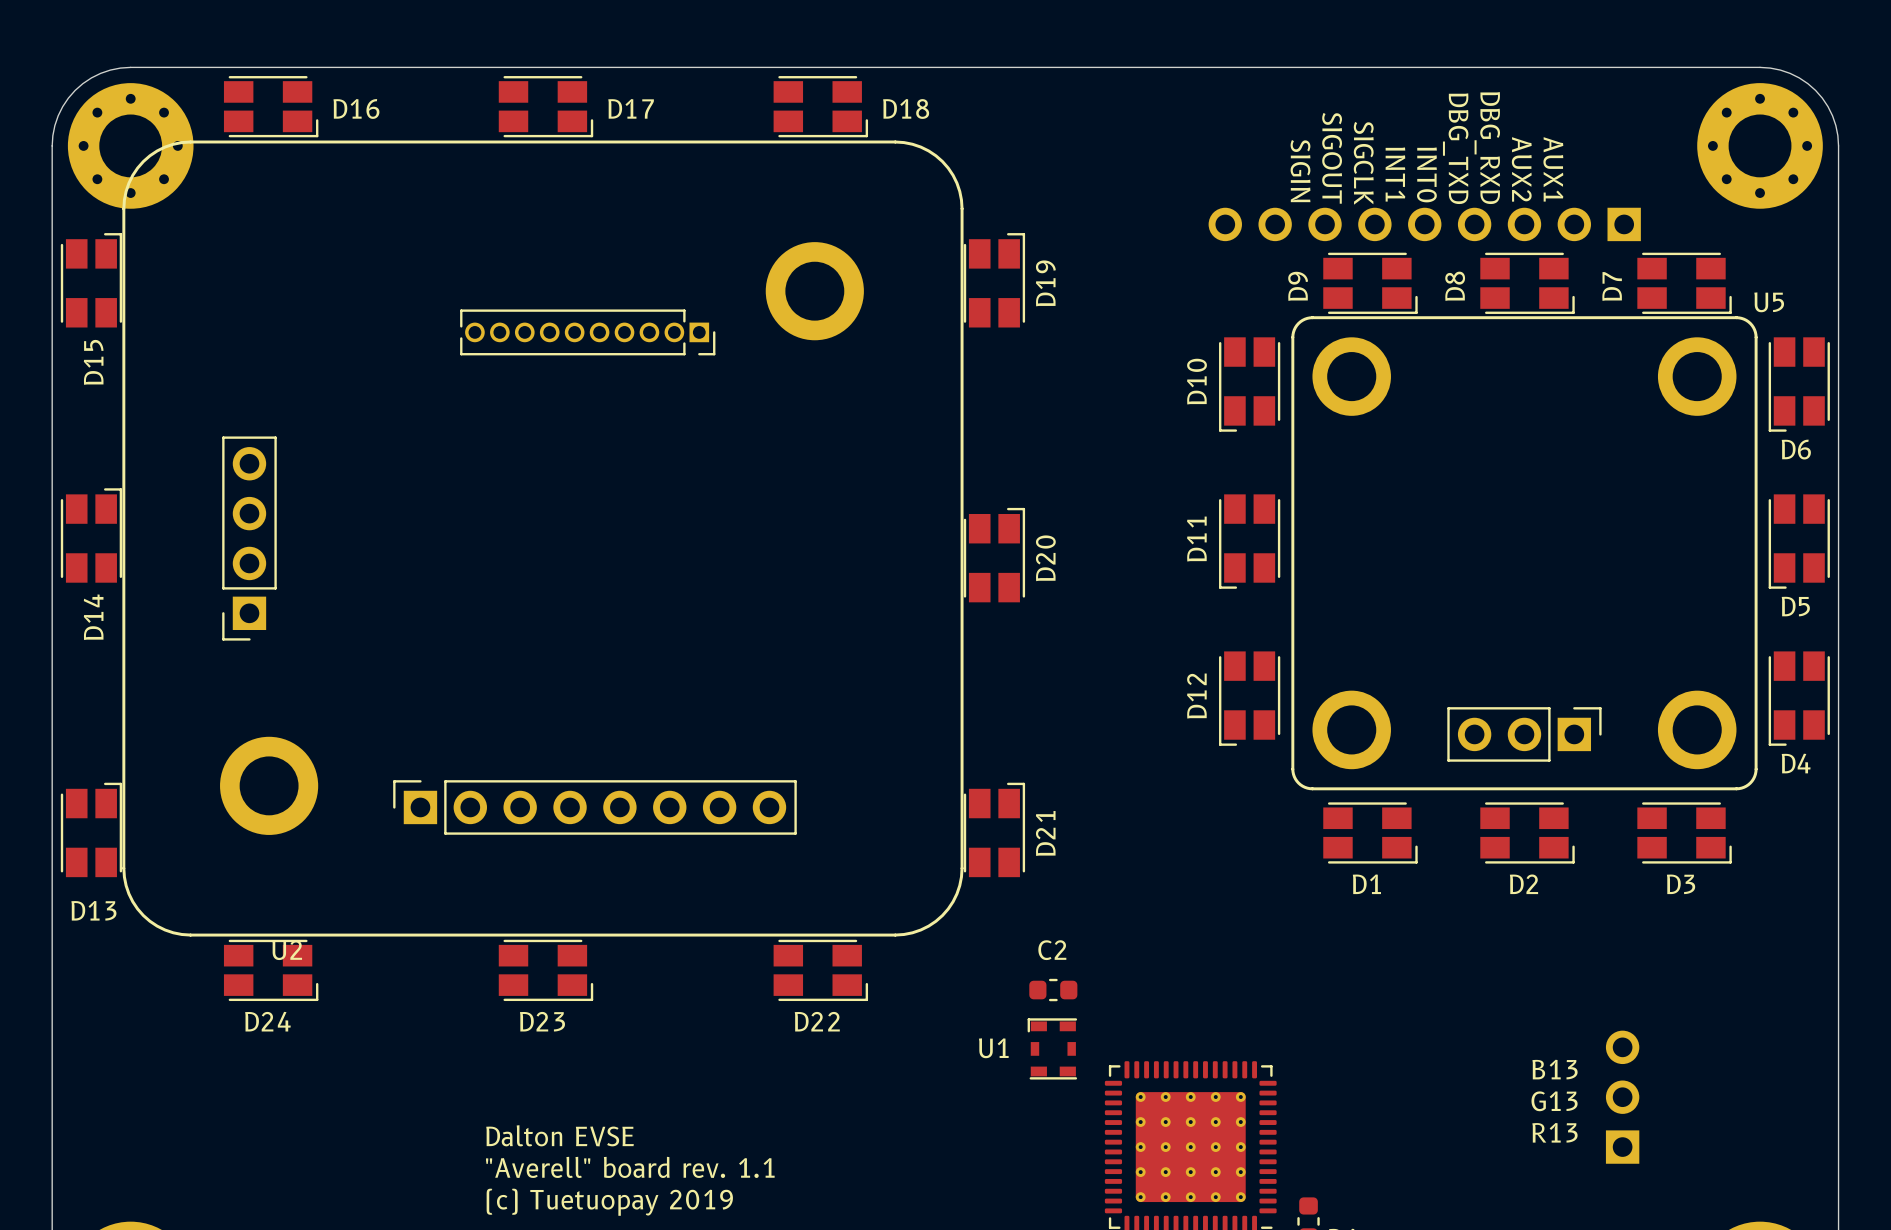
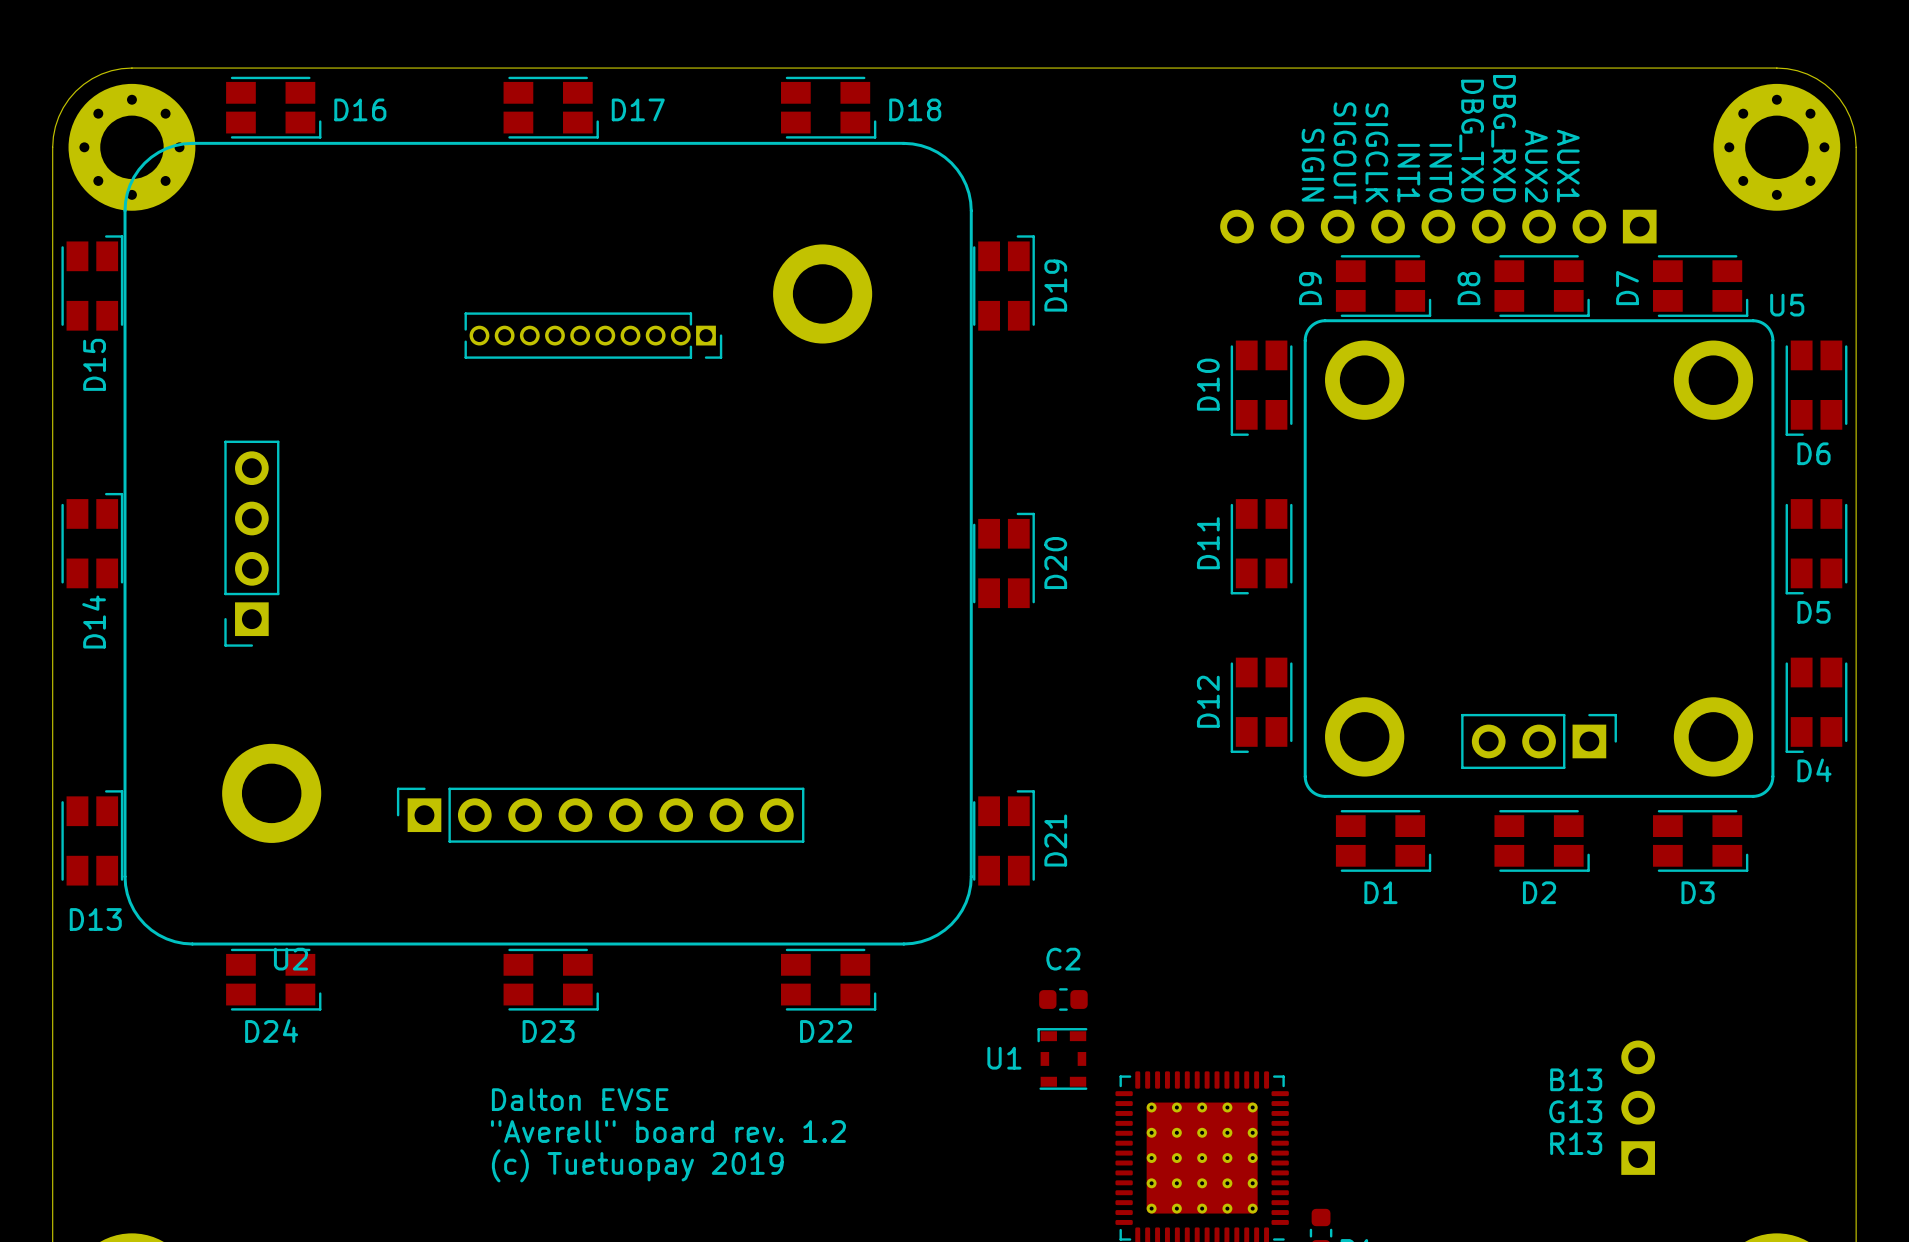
text: none -> "Averell" board rev. 1.2 (668, 1131)
text position: Dalton EVSE (560, 1135) -> Dalton EVSE (580, 1099)
text: "Averell" board rev. 1.1 (630, 1167) -> none
text position: (c) Tuetuopay 2019 (609, 1202) -> (c) Tuetuopay 2019 (637, 1165)

